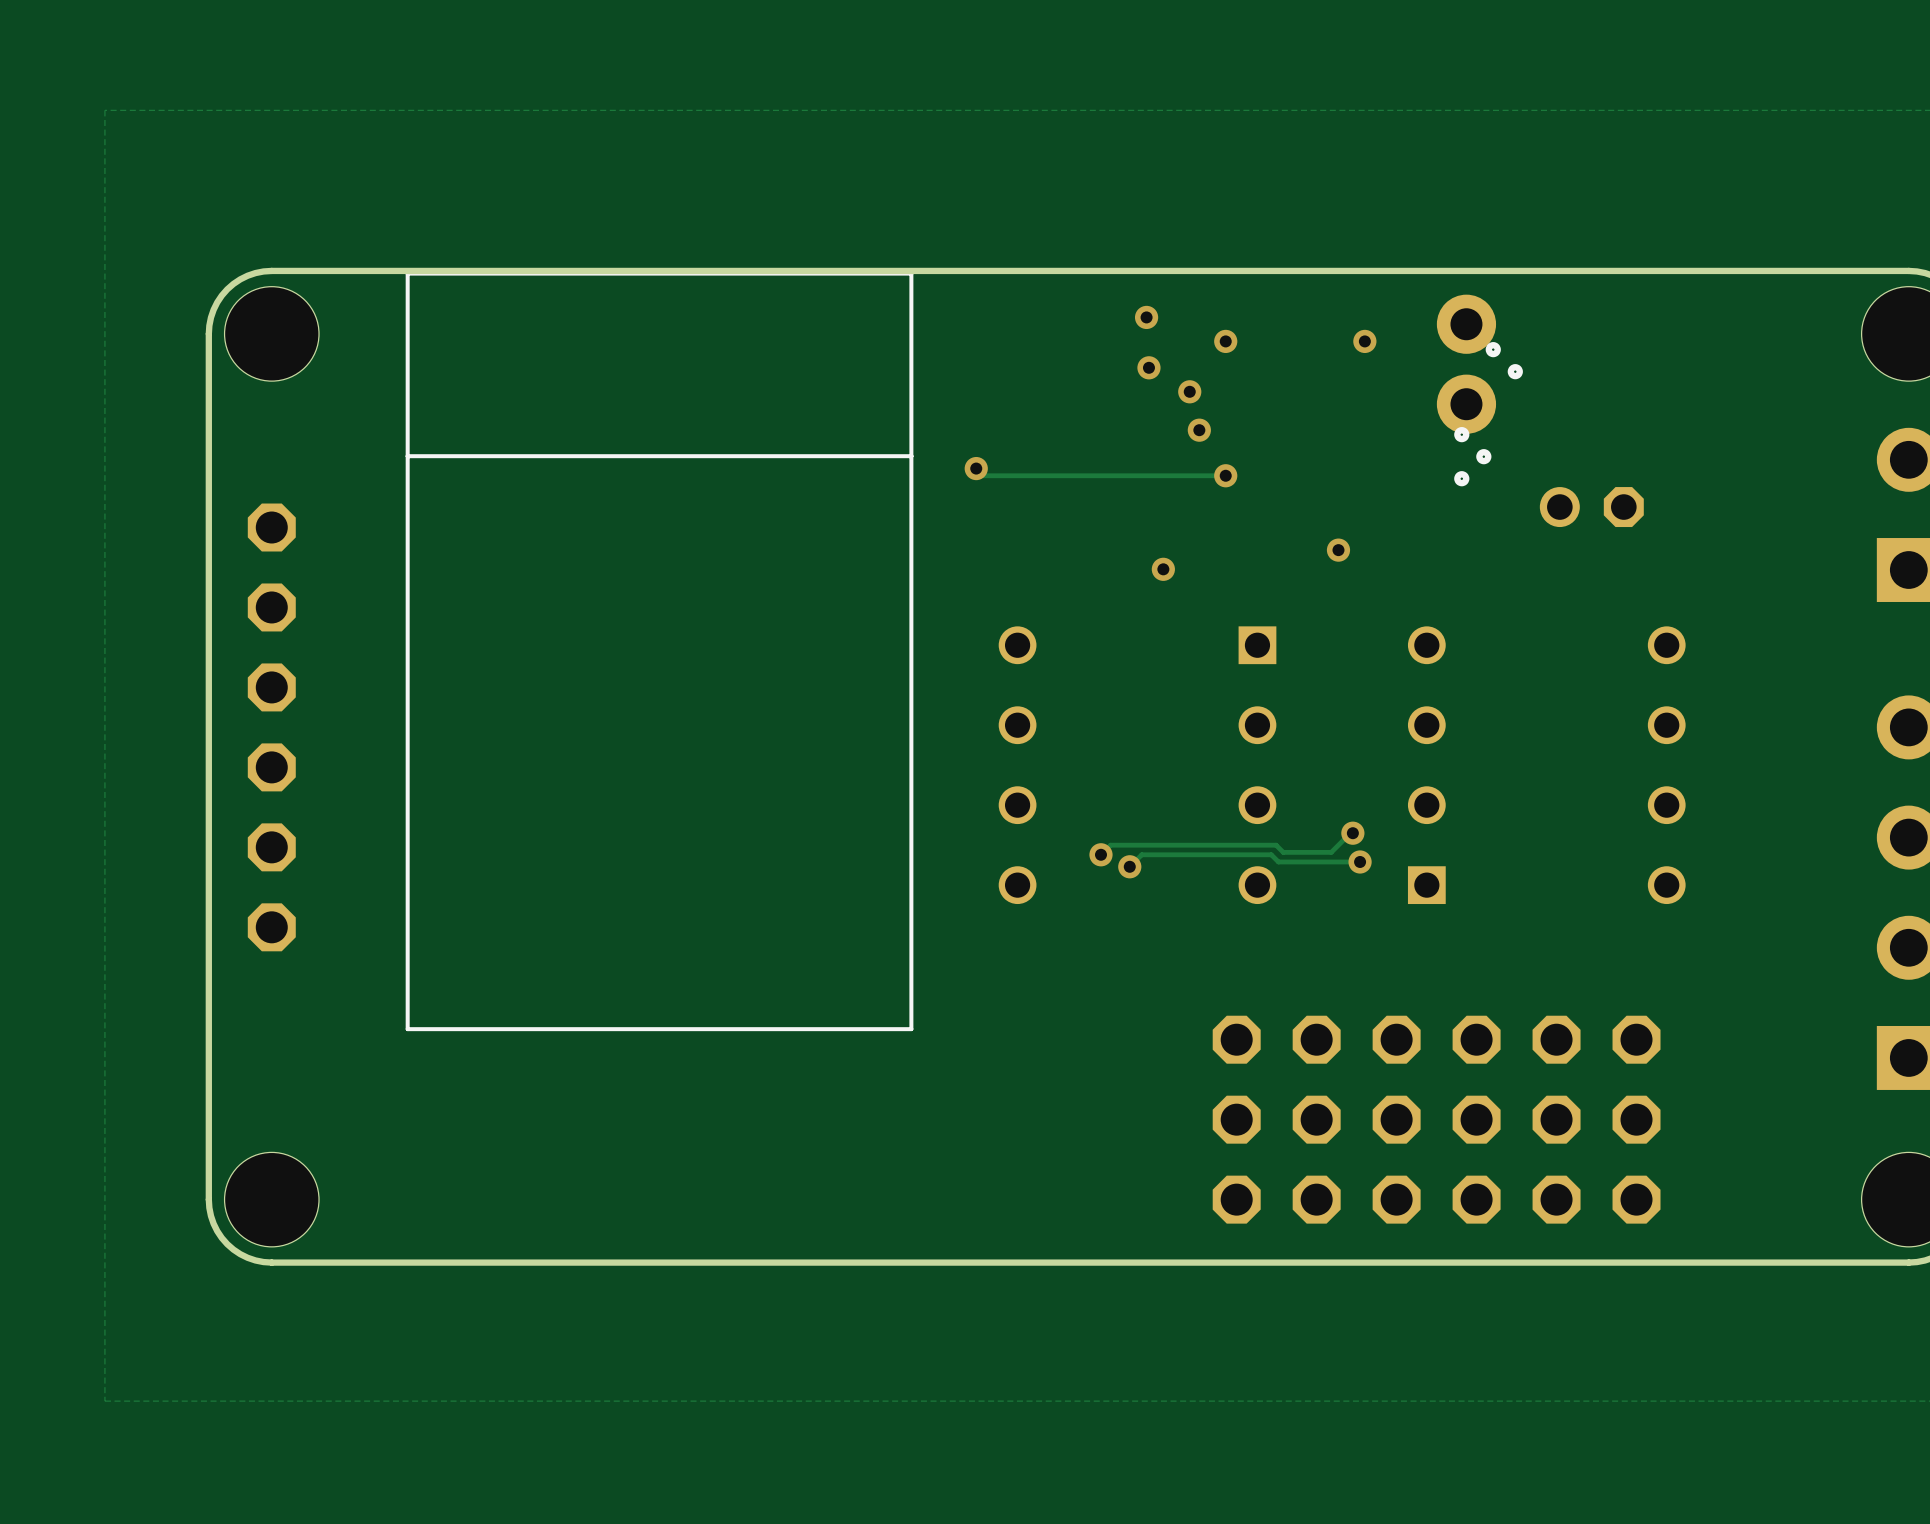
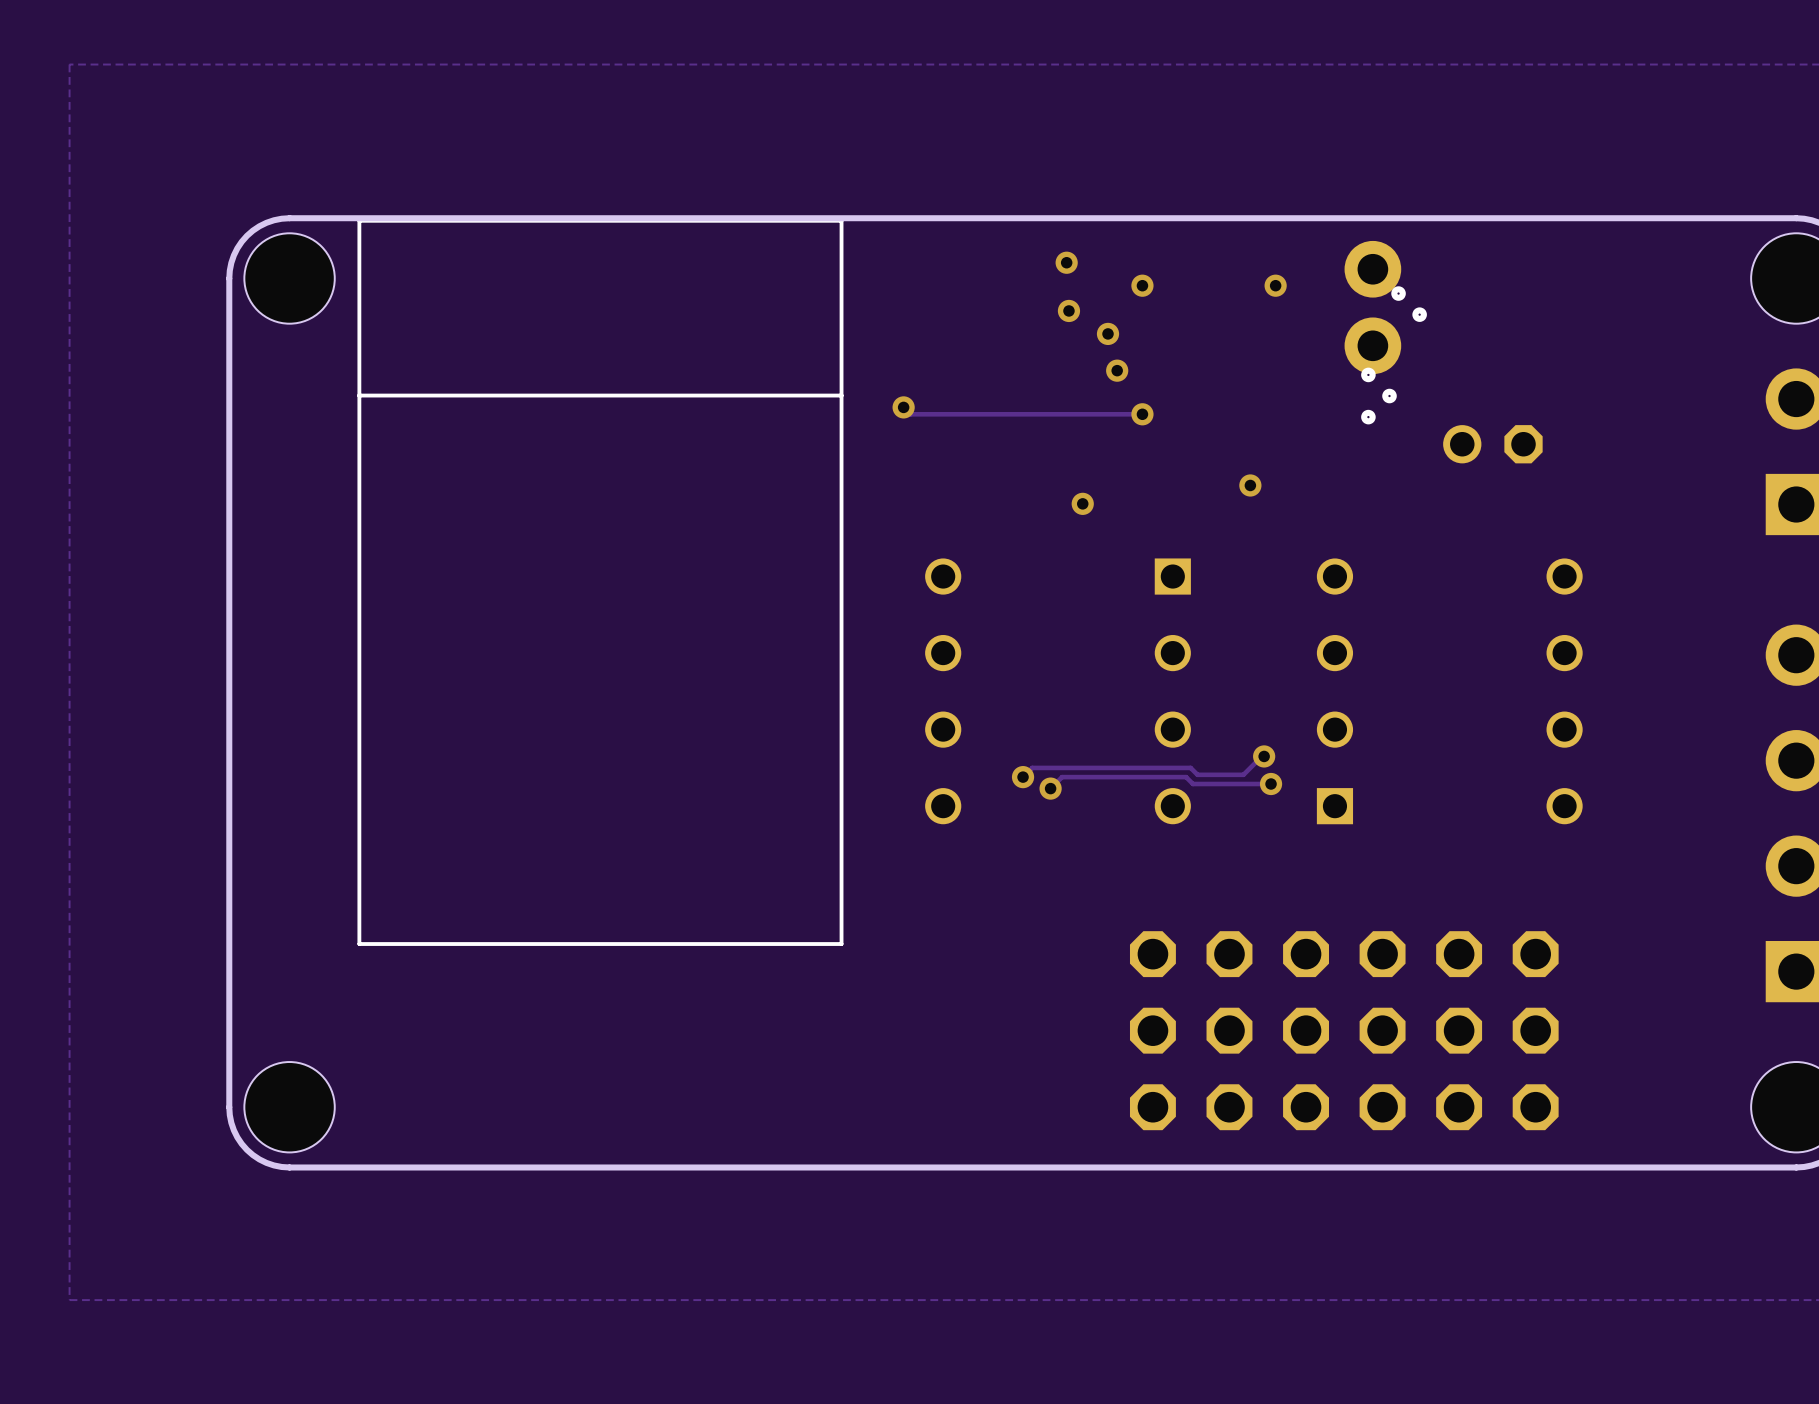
board edge: (334, 270) (263, 271) (240, 279) (227, 289) (217, 302) (210, 317) (208, 333) (209, 1207) (213, 1223) (221, 1237) (233, 1249) (247, 1257) (271, 1262) (334, 1262) -> (289, 218) (266, 222) (246, 235) (233, 255) (229, 278) (229, 1115) (237, 1137) (252, 1155) (266, 1162) (289, 1167)
hole position: (271, 333) -> (289, 278)
part: (271, 727) -> none
hole position: (271, 1199) -> (289, 1107)

